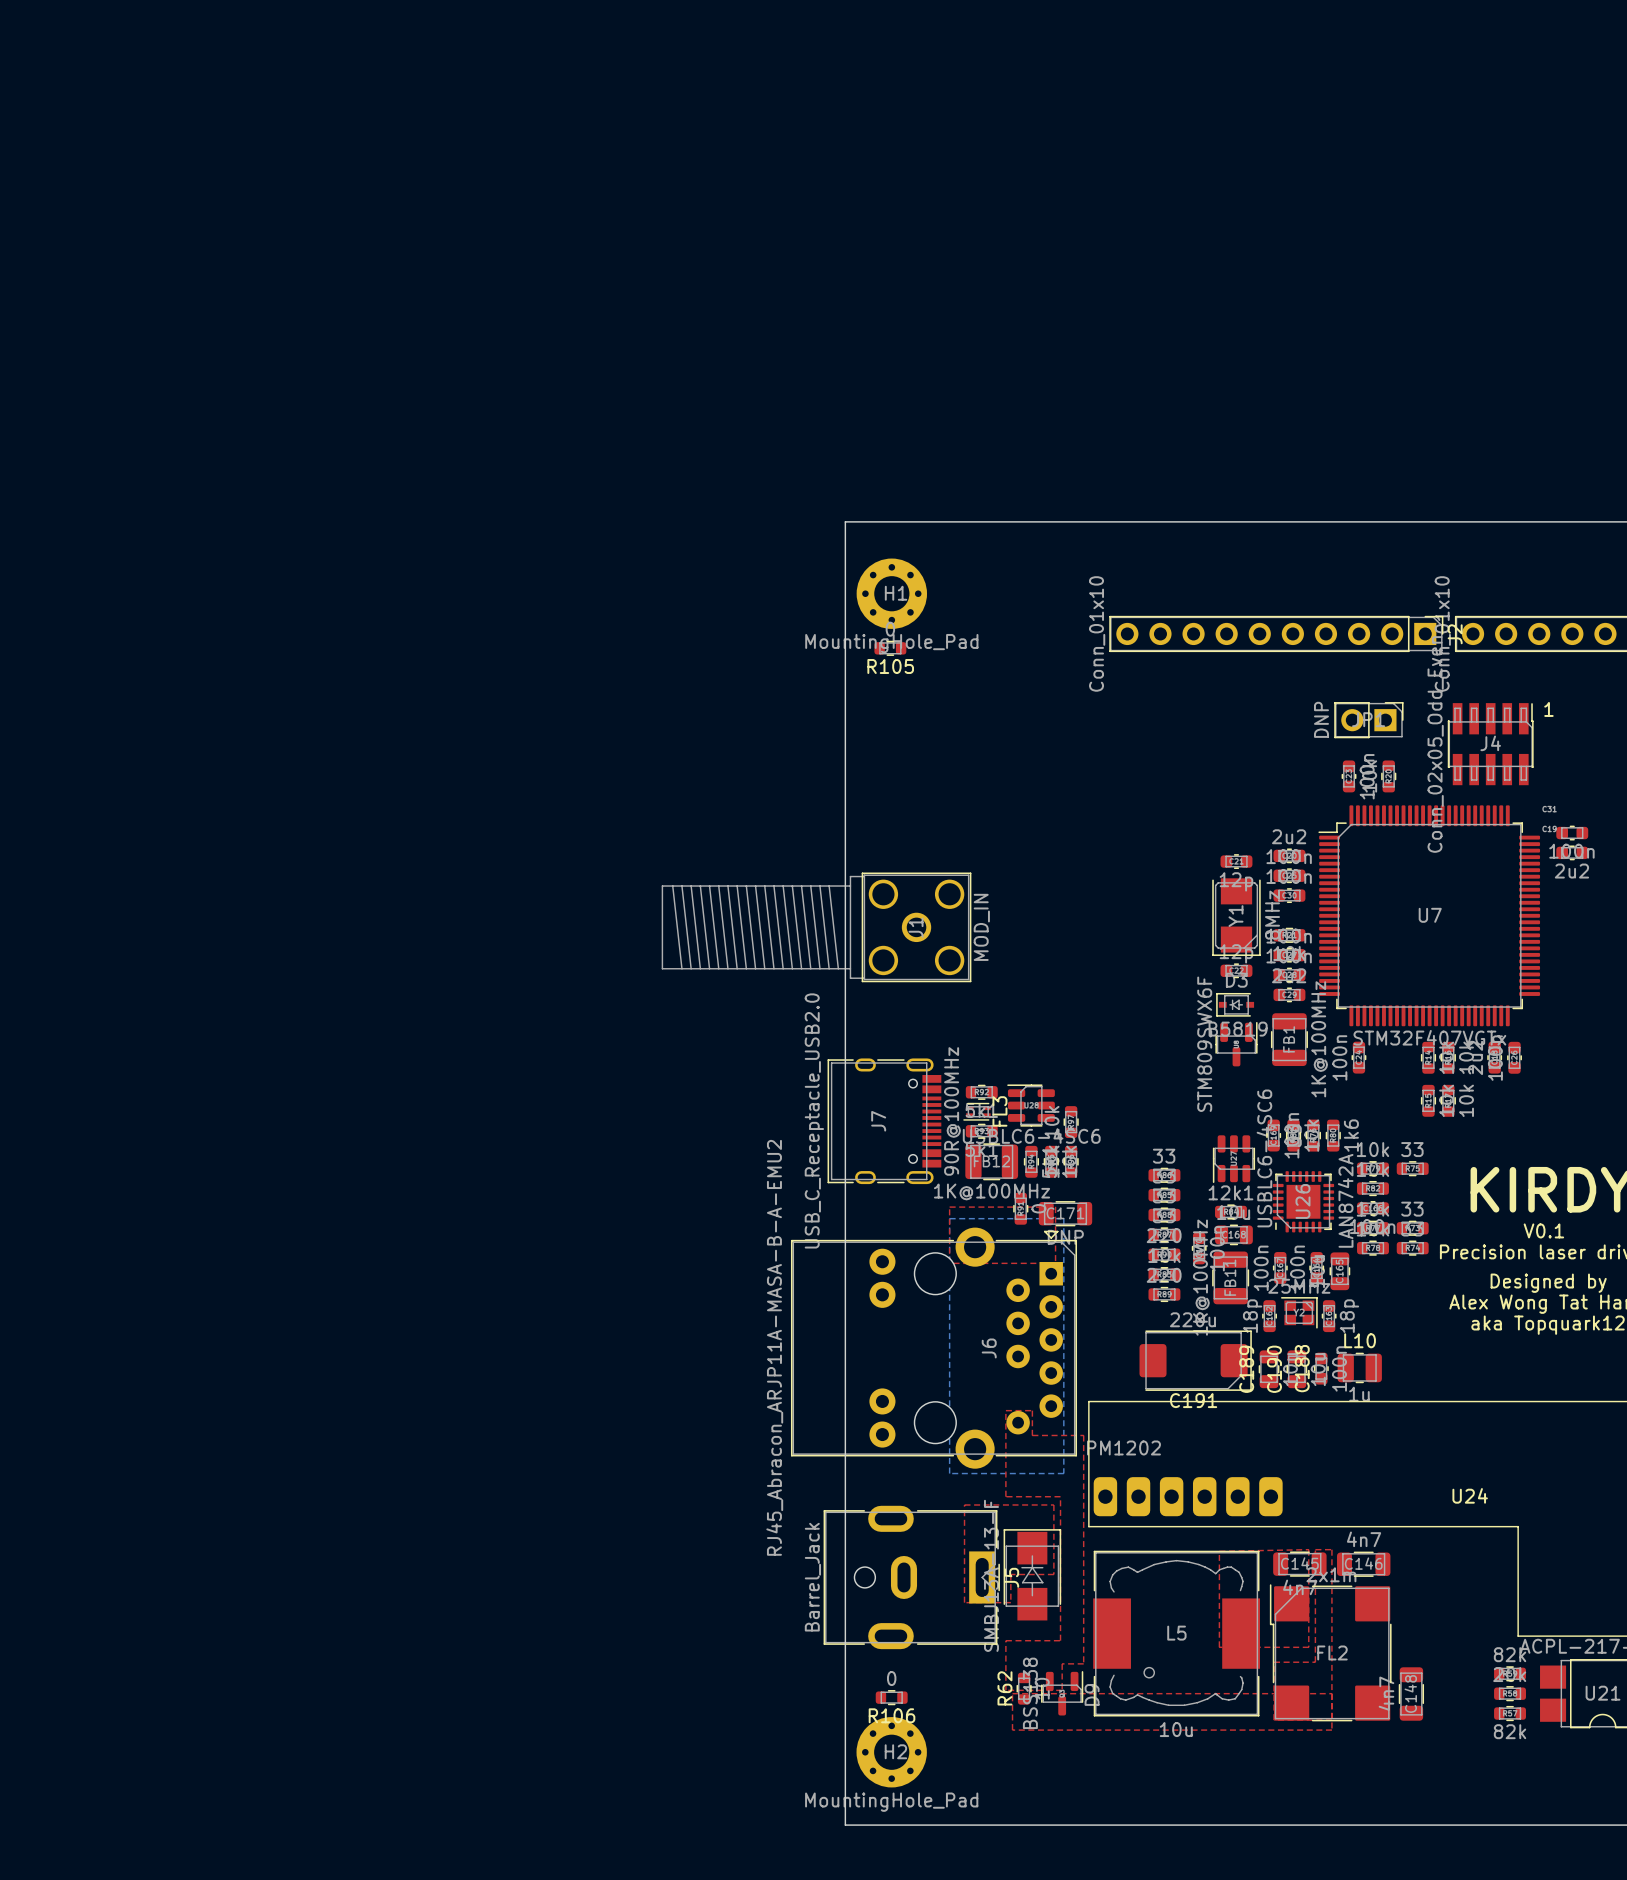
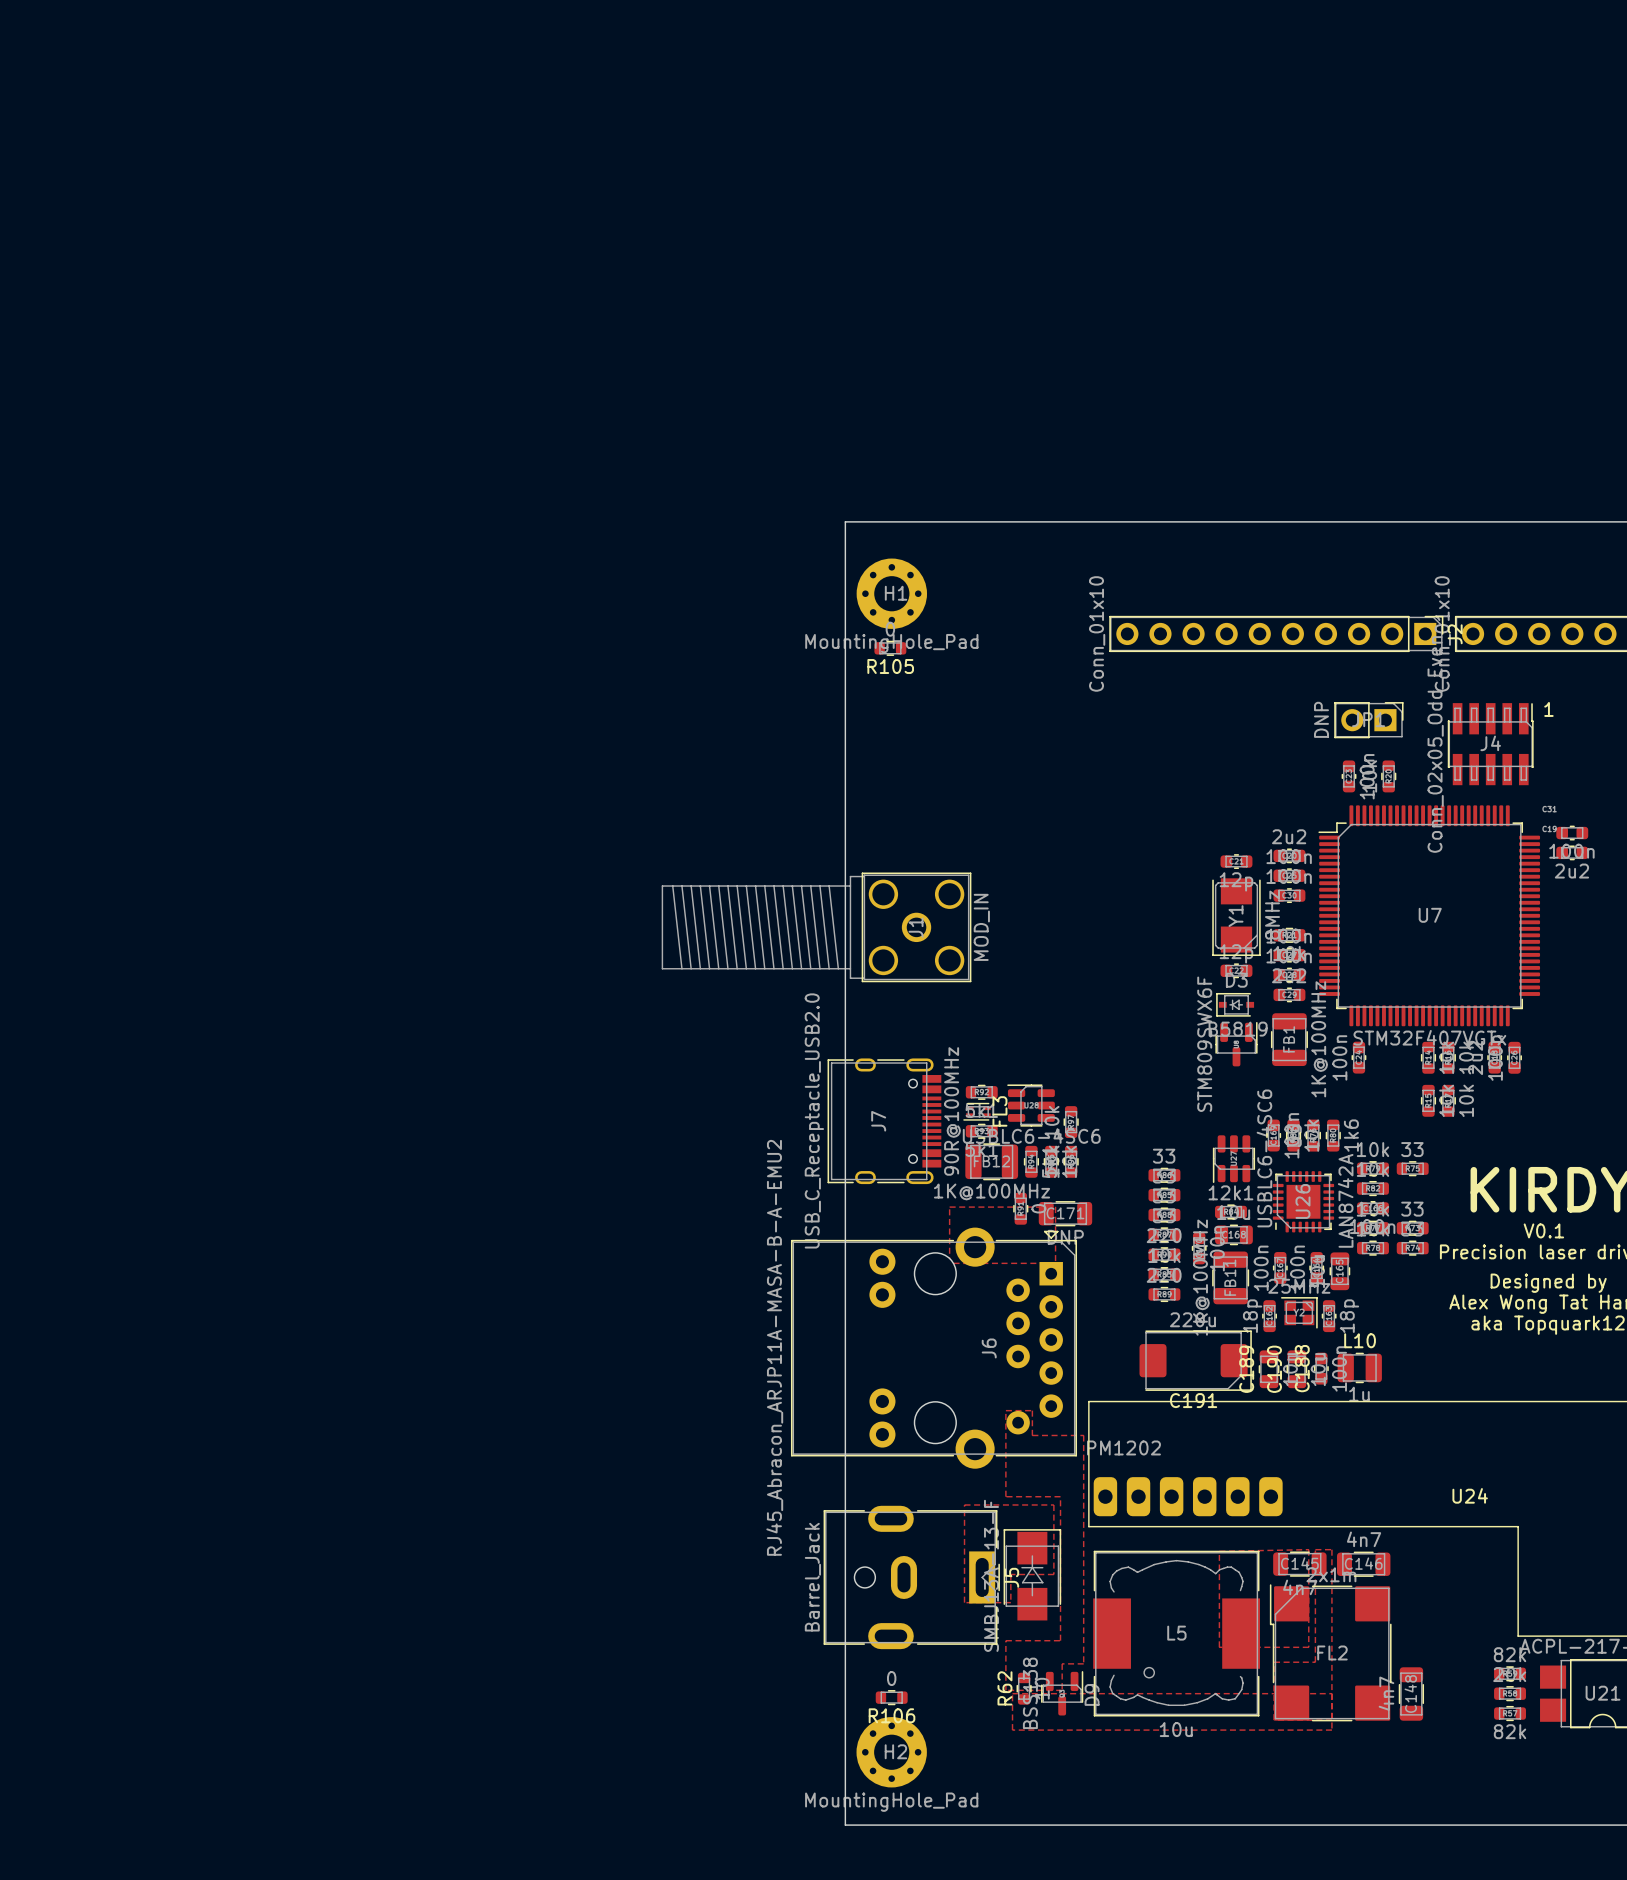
bottom zone outline: (949, 1218) (949, 1473) (1063, 1473) (1063, 1218) (949, 1218) -> none

